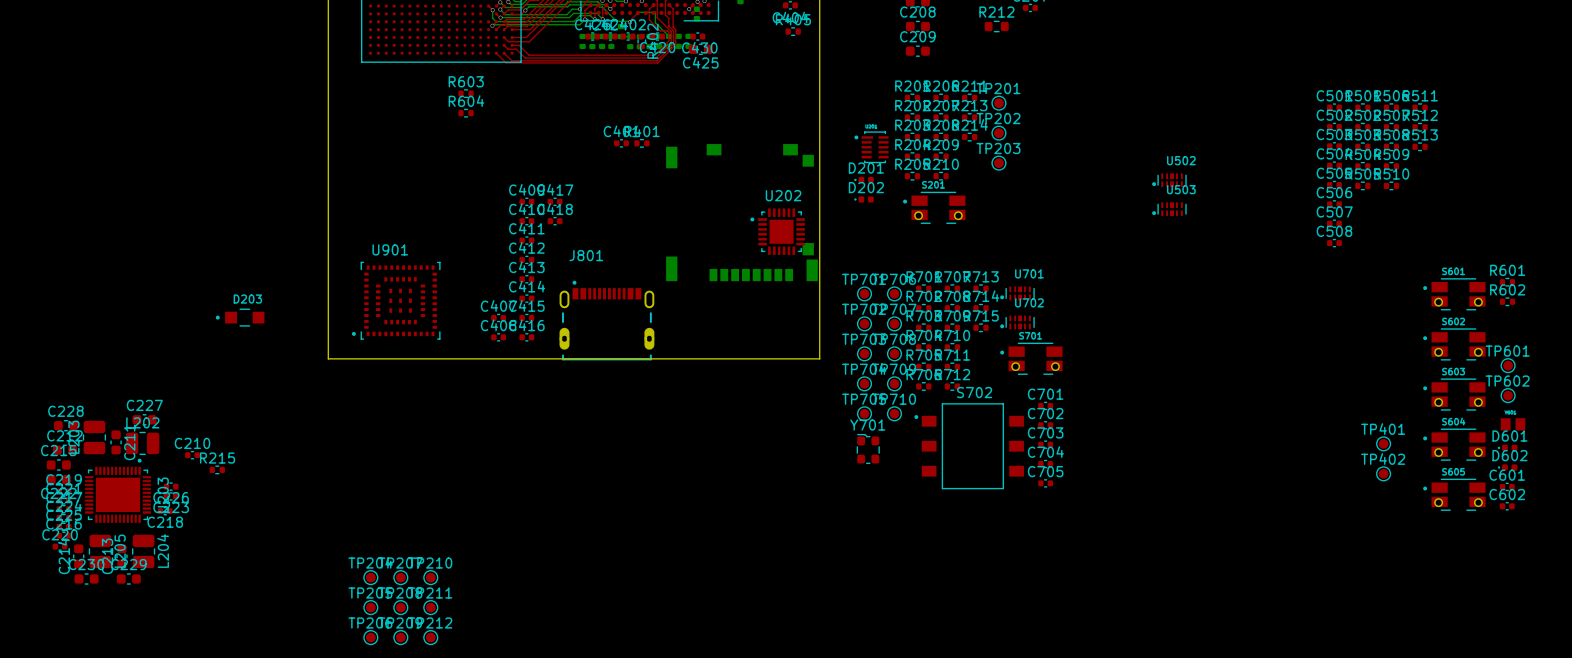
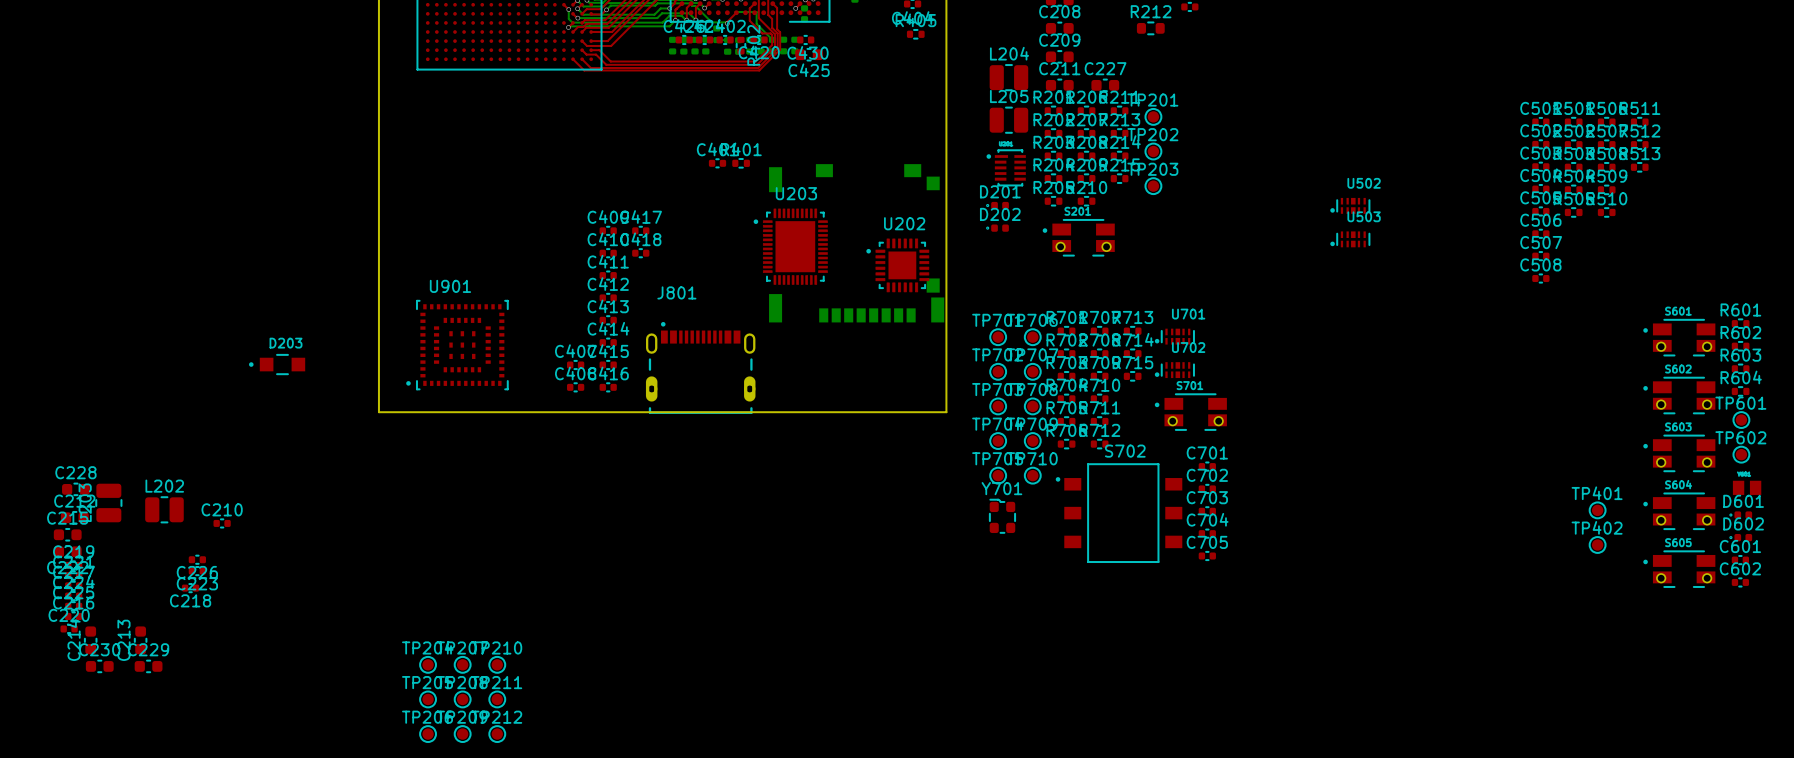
R603 position: (466, 93) -> (1740, 368)
R604 position: (466, 113) -> (1740, 391)
C227 position: (144, 419) -> (1105, 85)
C211 rotation: 0° (116, 442) -> 90° clockwise (1059, 85)
C211 position: (116, 442) -> (1059, 85)
C211 name position: C211 (129, 442) -> C211 (1059, 68)
R215 position: (217, 469) -> (1119, 178)
U203 rotation: 0° (118, 490) -> 90° counterclockwise (790, 246)
U203 position: (118, 490) -> (790, 246)
L205 rotation: 0° (100, 551) -> 90° clockwise (1008, 120)
L205 position: (100, 551) -> (1008, 120)
L205 name position: L205 (120, 551) -> L205 (1009, 96)
L204 rotation: 0° (143, 551) -> 90° clockwise (1008, 77)
L204 position: (143, 551) -> (1008, 77)
L204 name position: L204 (163, 551) -> L204 (1009, 53)

